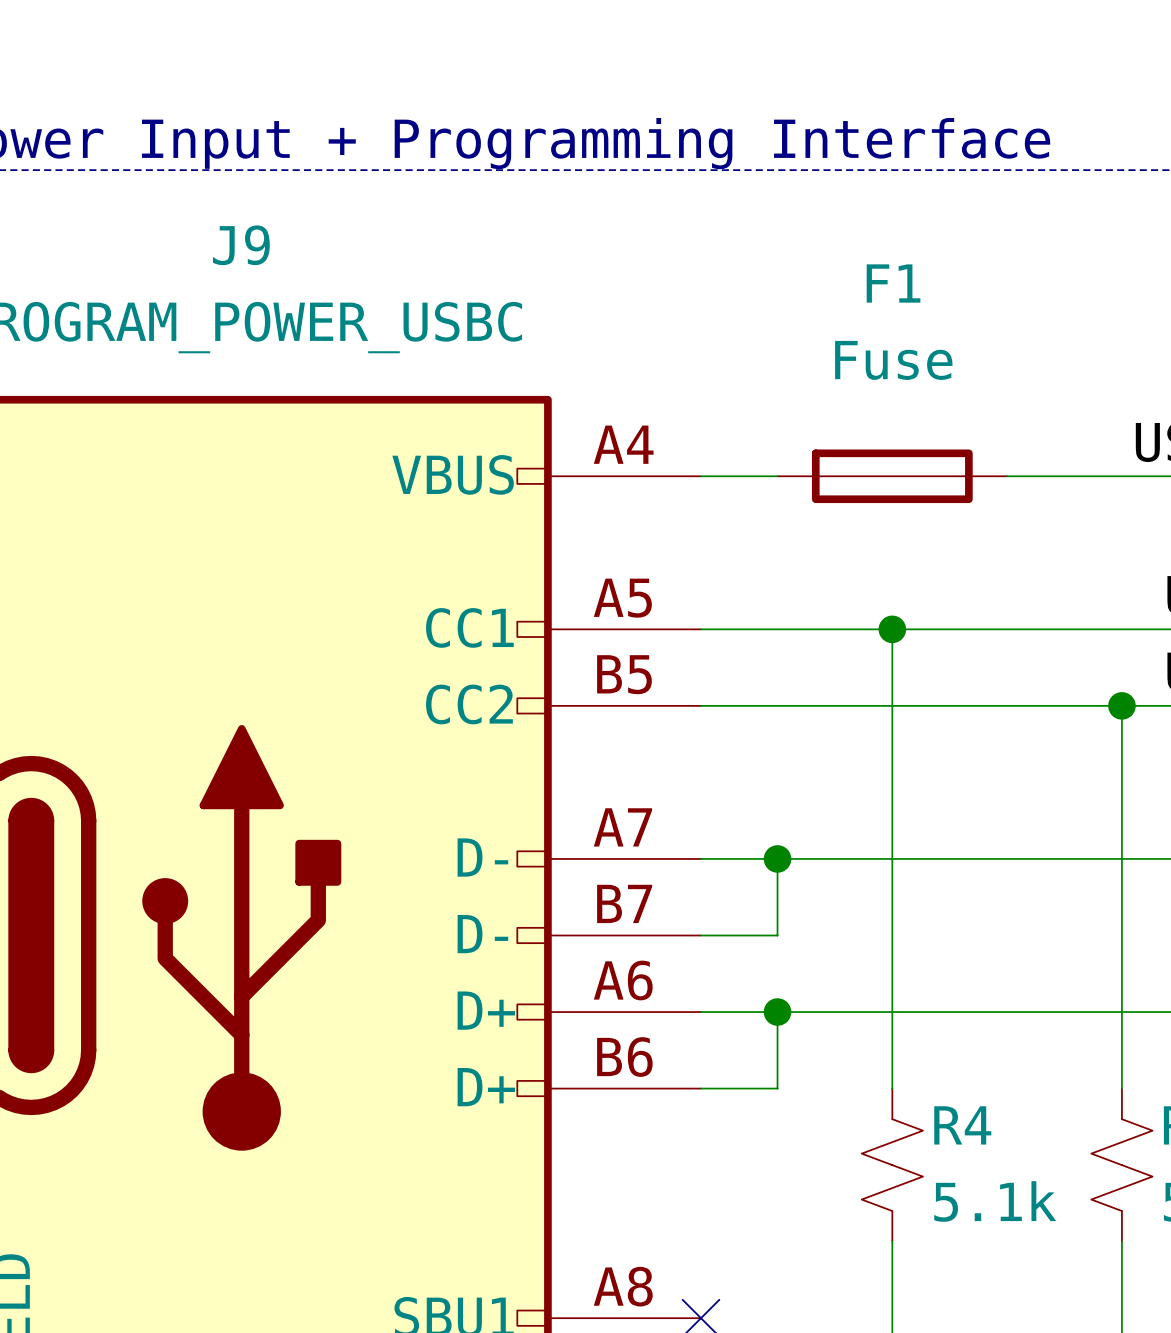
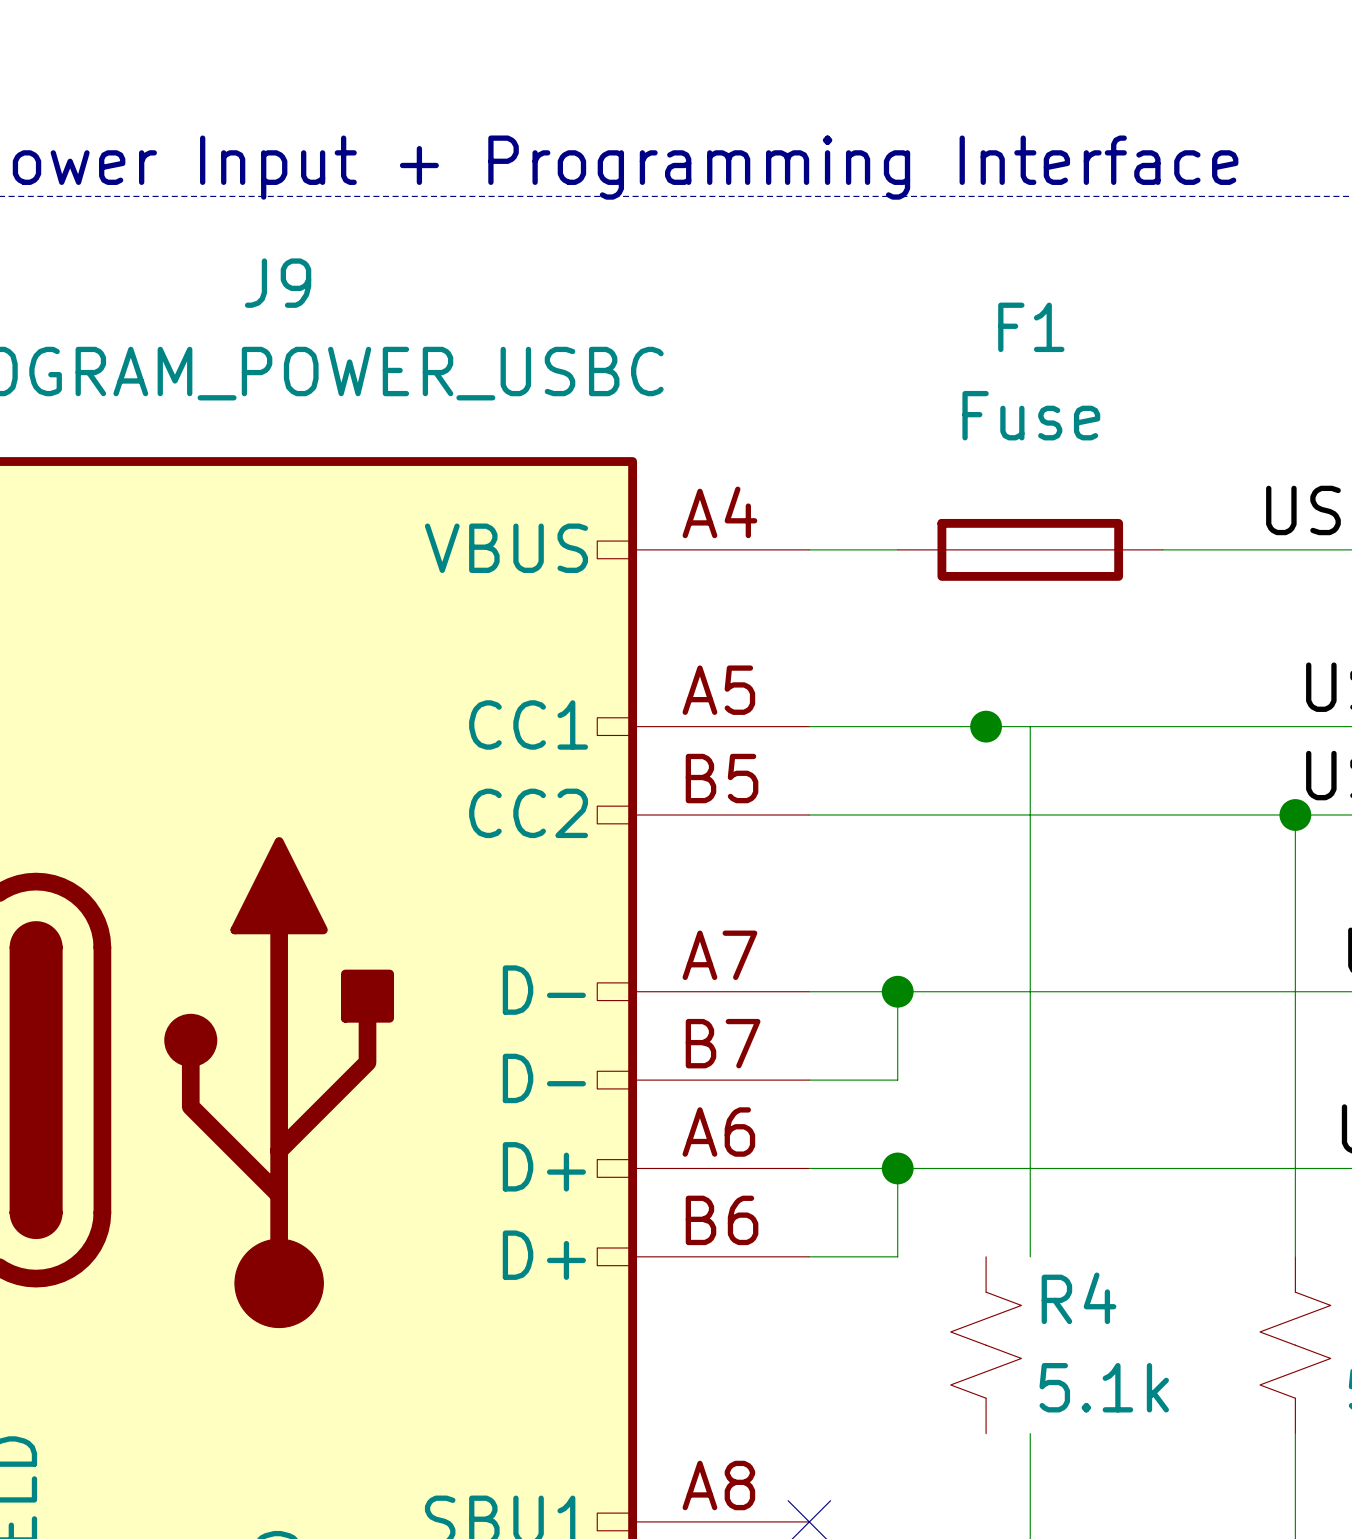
junction position: (892, 629) -> (986, 726)
R4 position: (892, 1165) -> (986, 1345)

